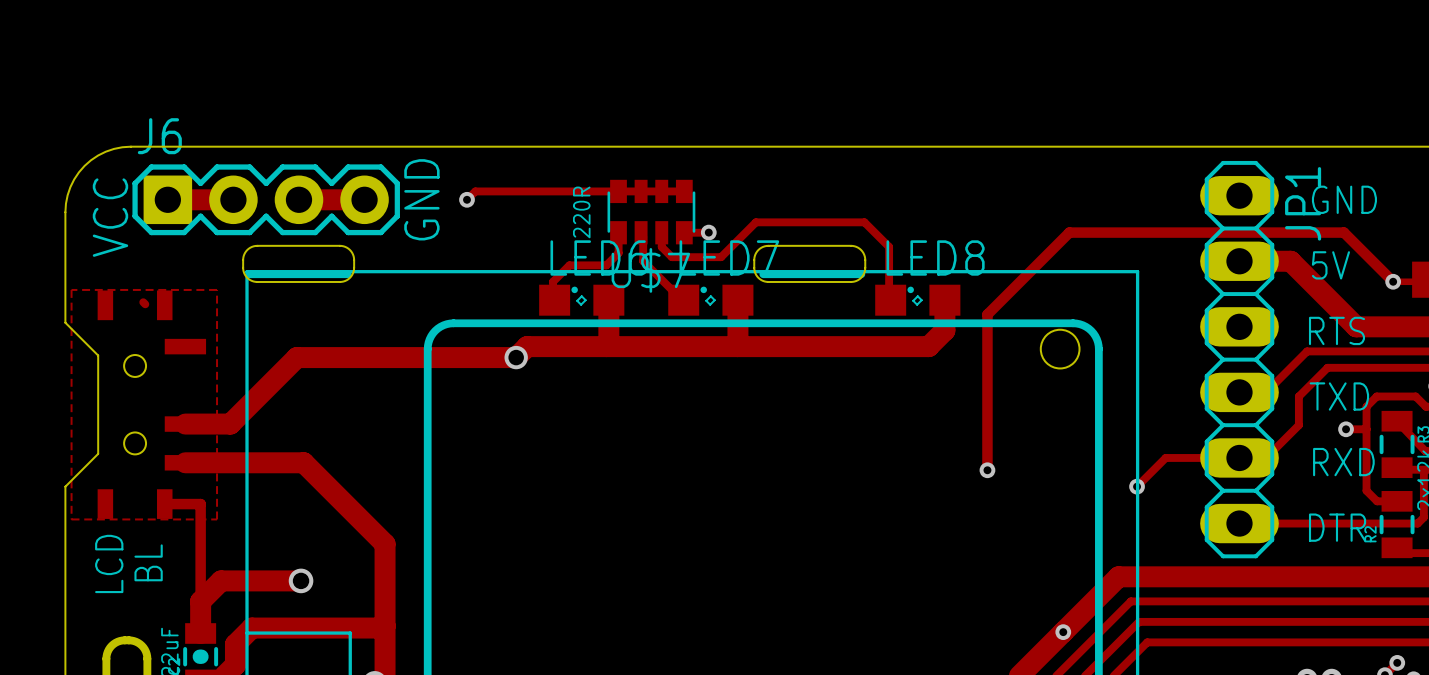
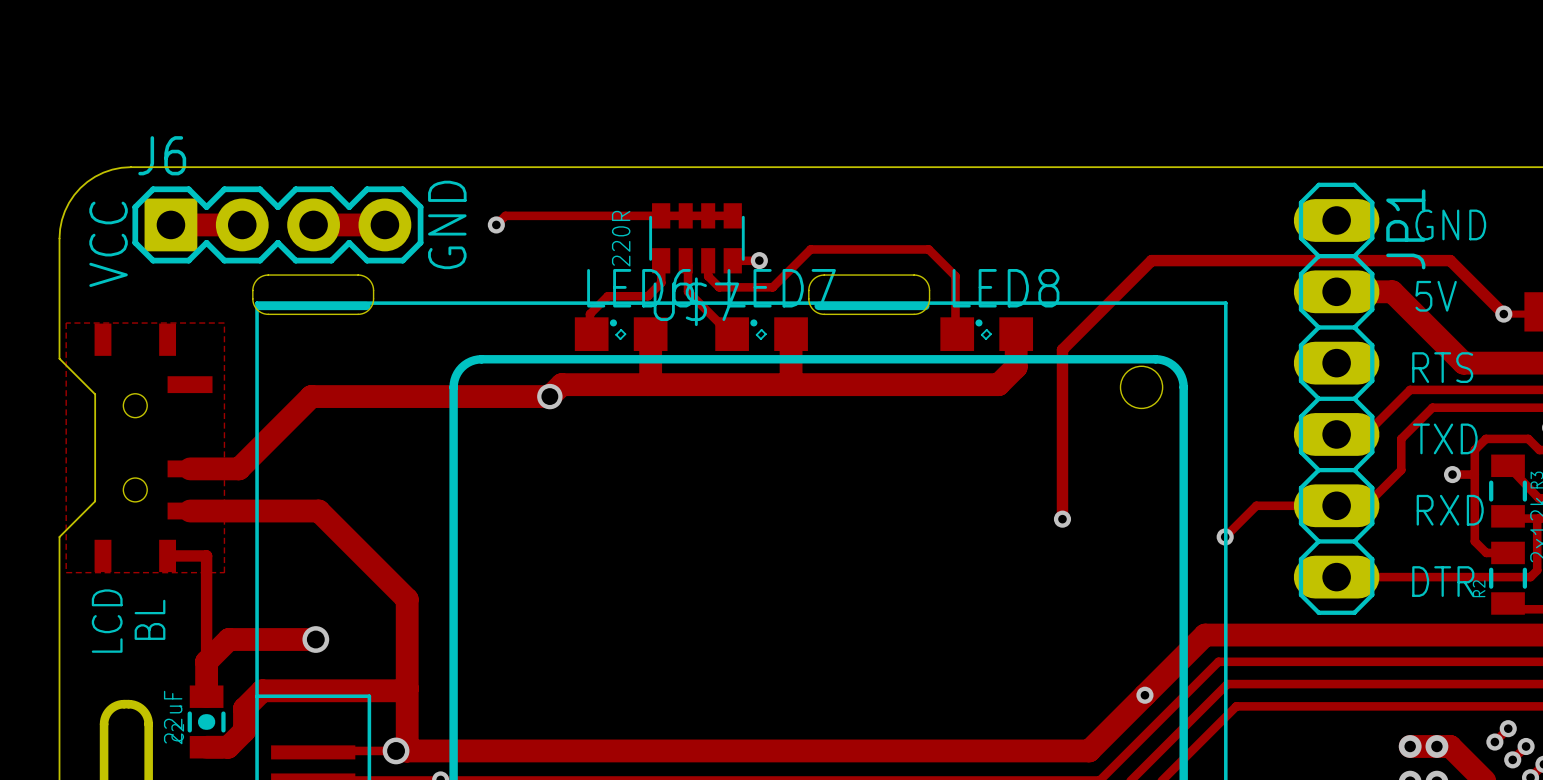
track: (143, 302) (145, 304) -> none

